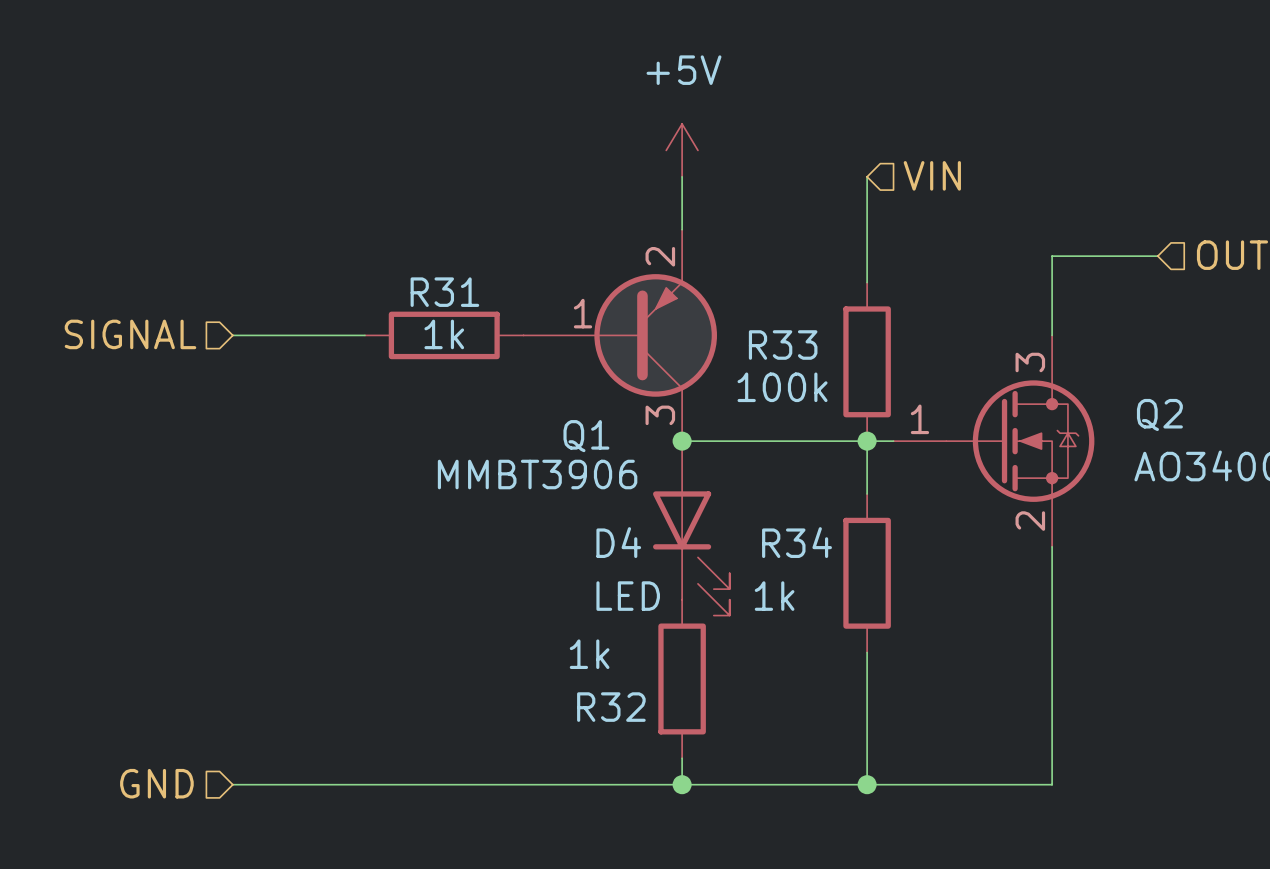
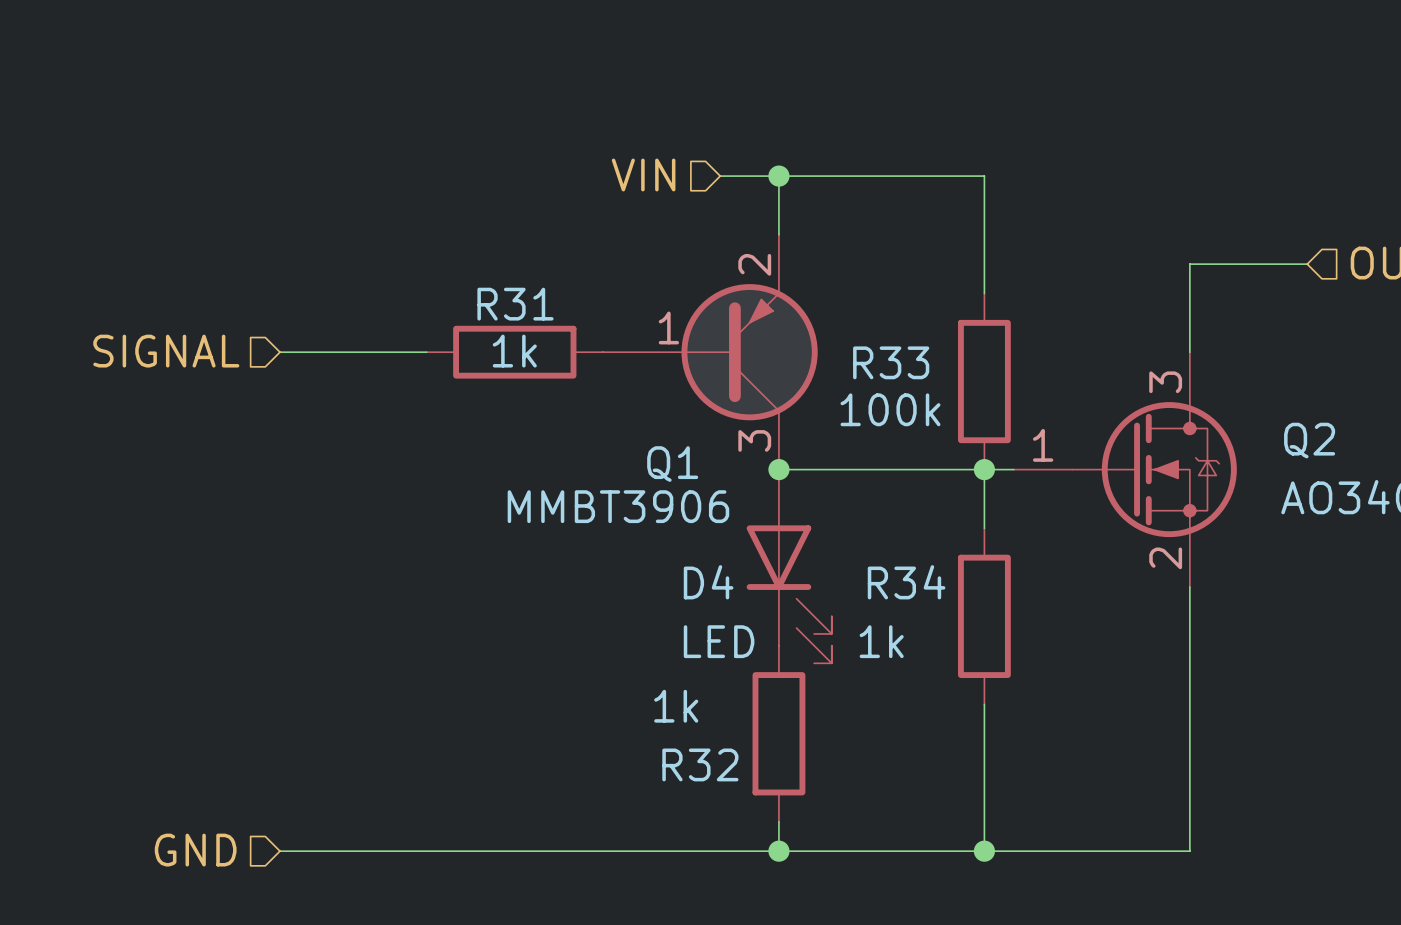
power symbol: +5V (682, 150) -> none
hierarchical label rotation: 0° (932, 175) -> 180° (643, 174)
hierarchical label position: VIN (932, 175) -> VIN (643, 174)
wire: none -> (720, 176) (984, 176)
junction: none -> (778, 176)

